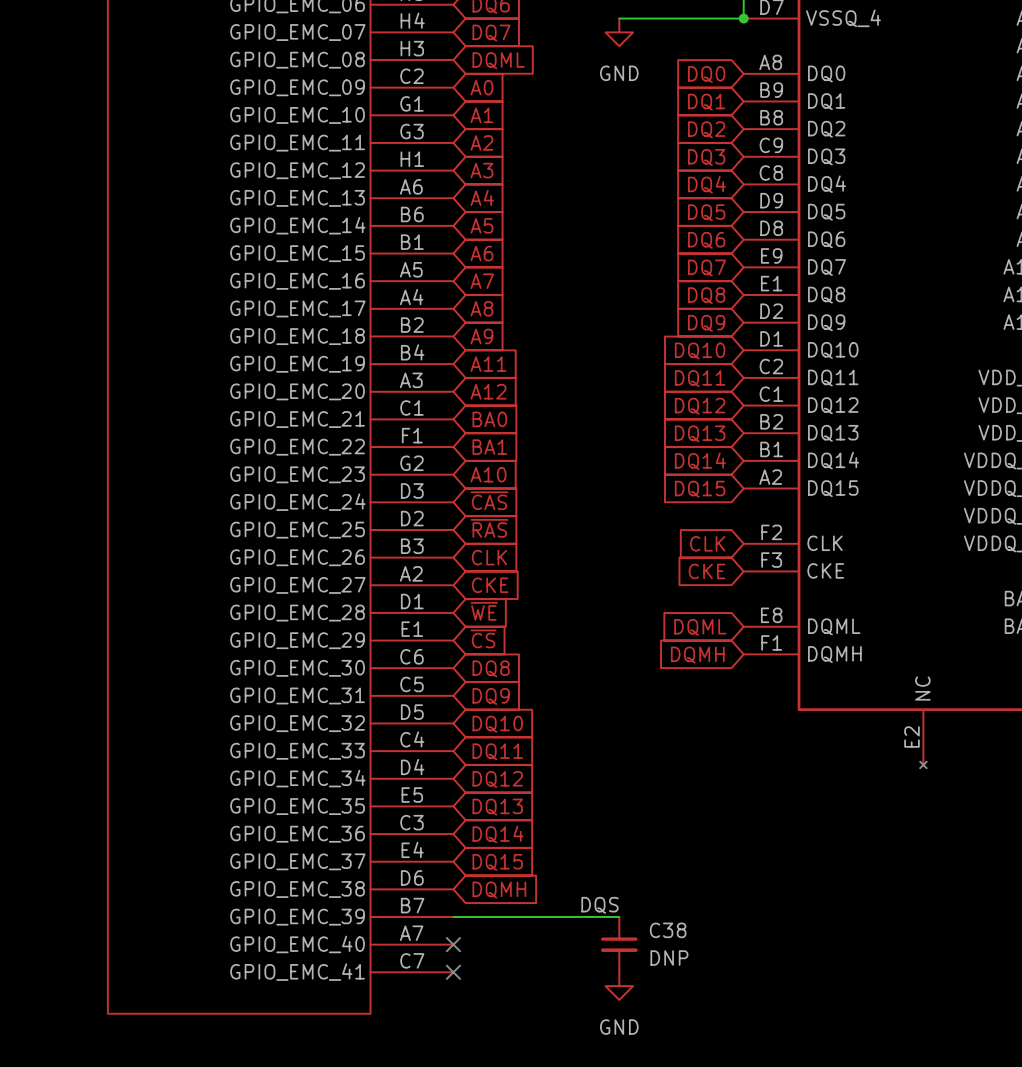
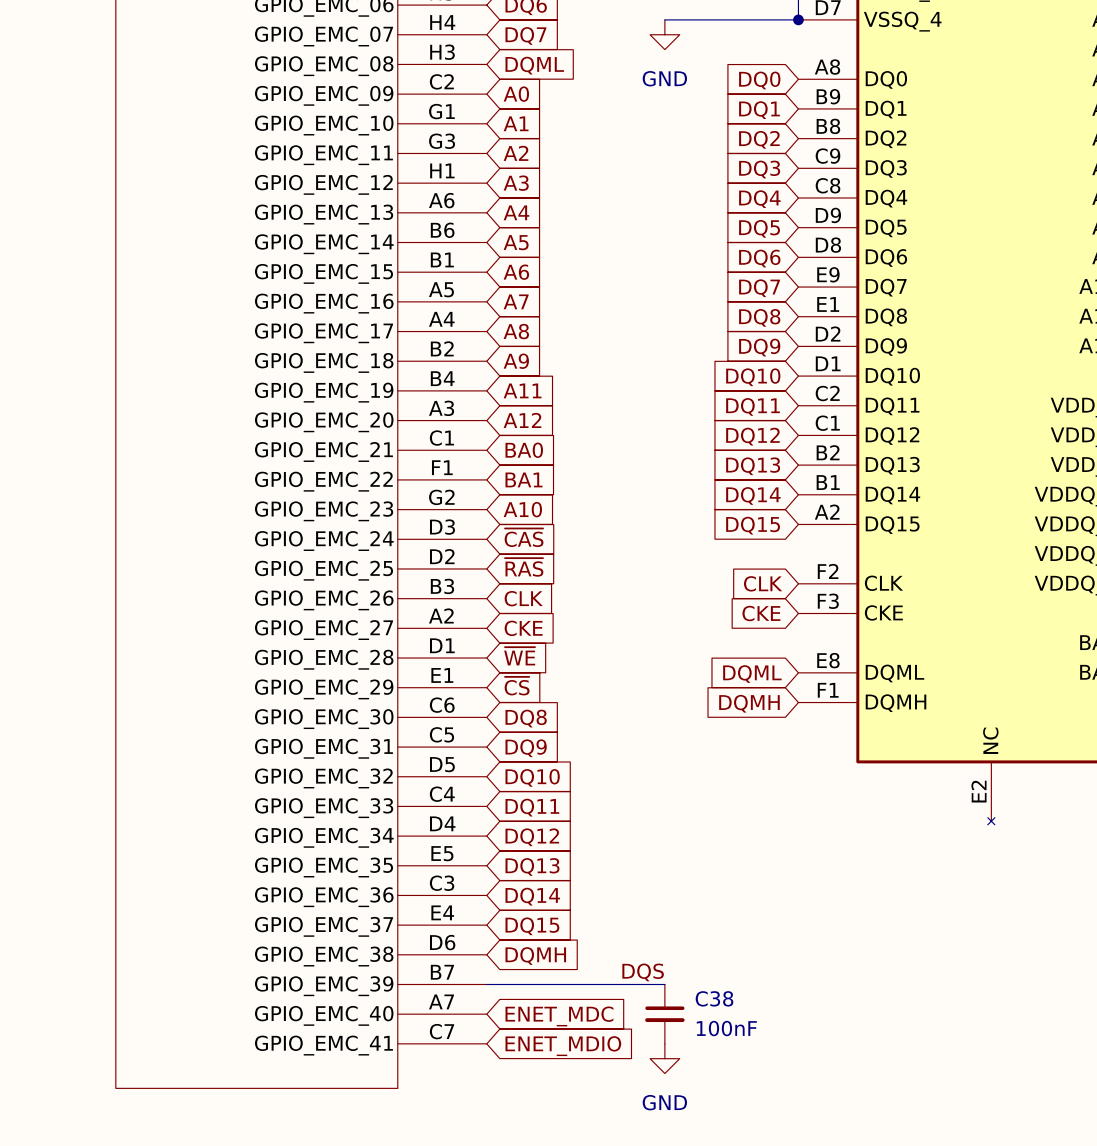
no-connect mark: (453, 944) -> none
global label: none -> ENET_MDC (559, 1016)
C38 value: DNP (669, 958) -> 100nF (726, 1028)
no-connect mark: (453, 972) -> none
global label: none -> ENET_MDIO (563, 1046)

